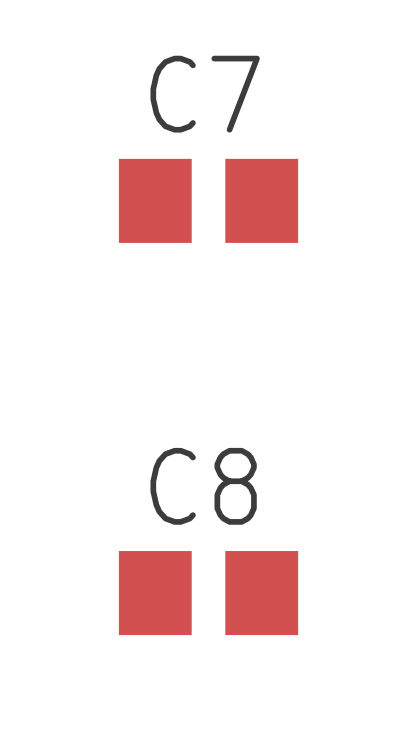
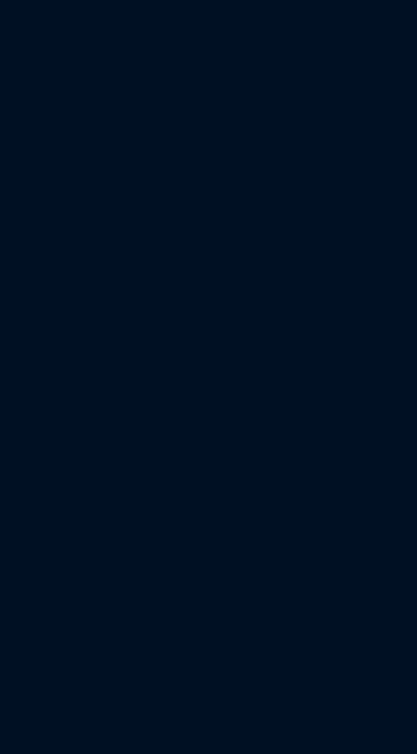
C7: (208, 200) -> none
C8: (208, 593) -> none

